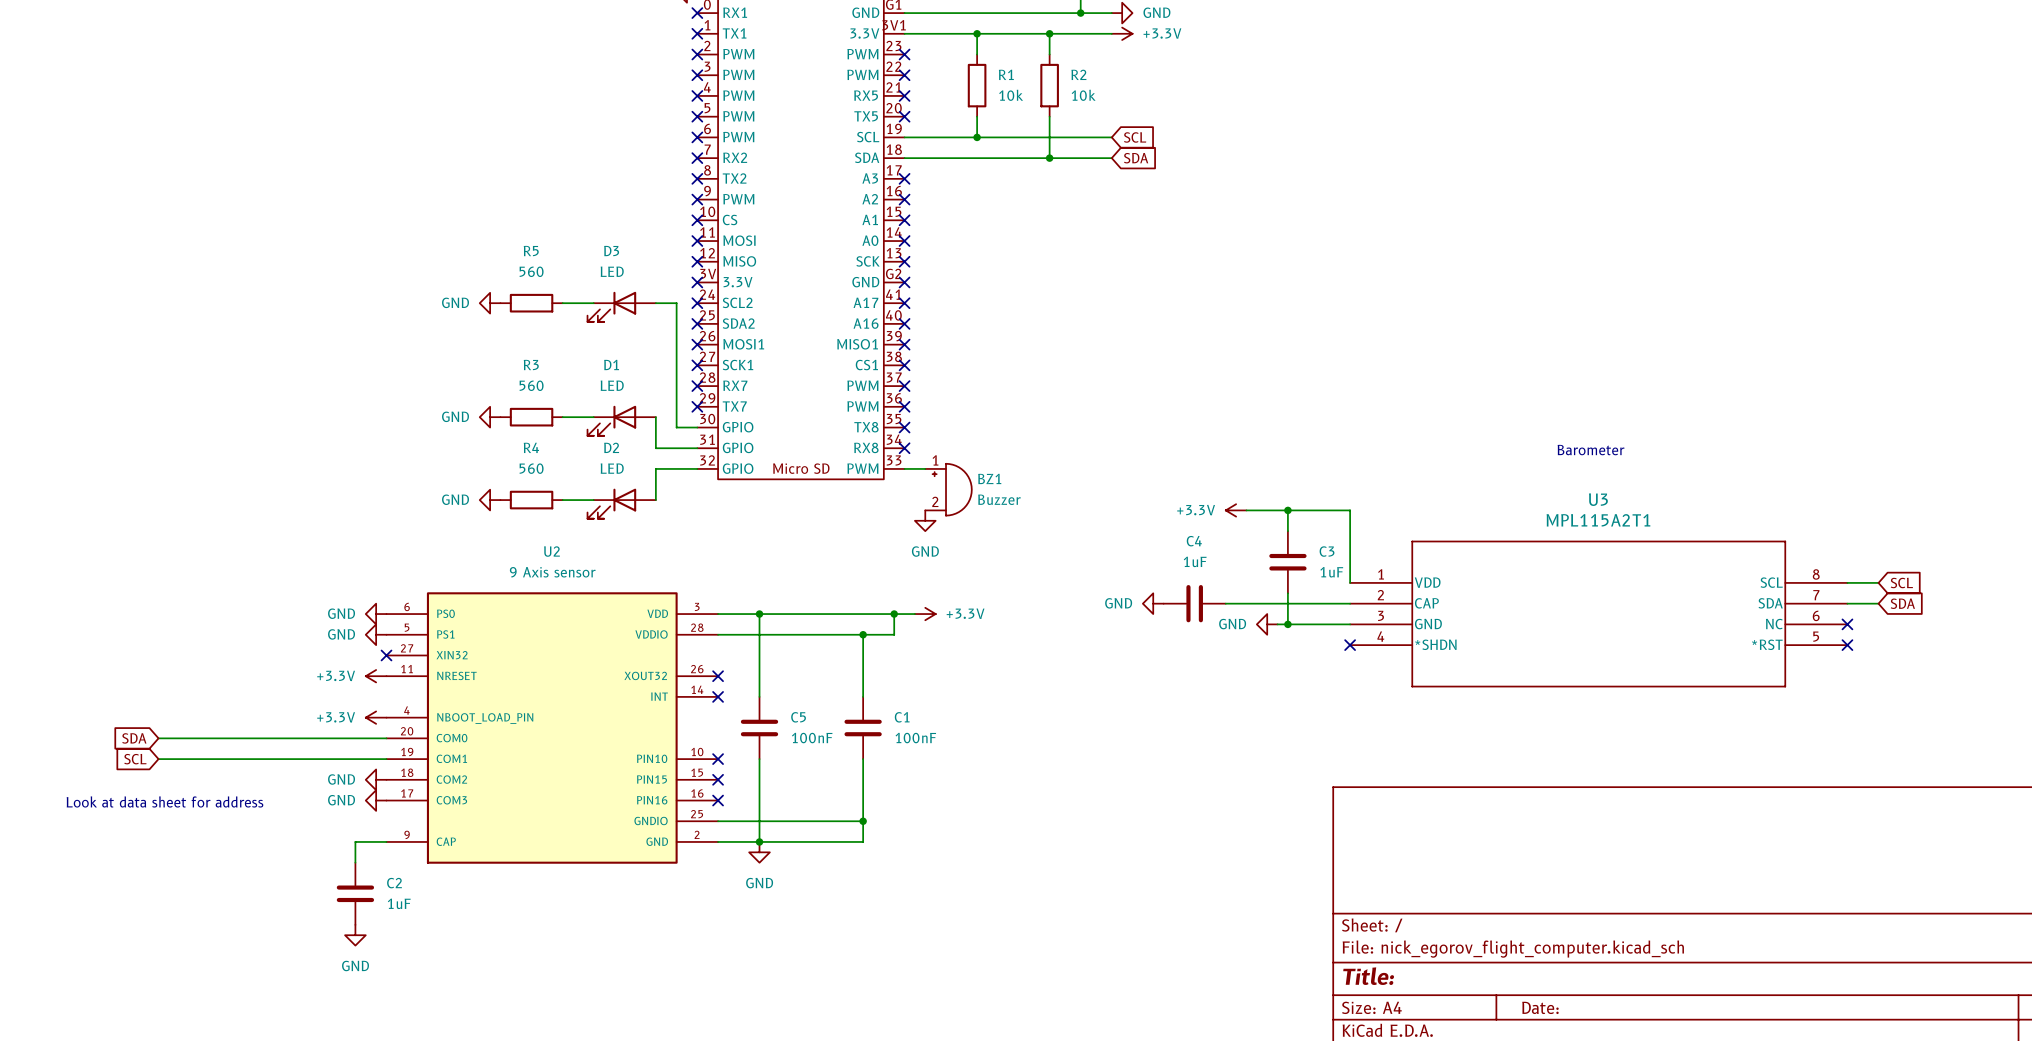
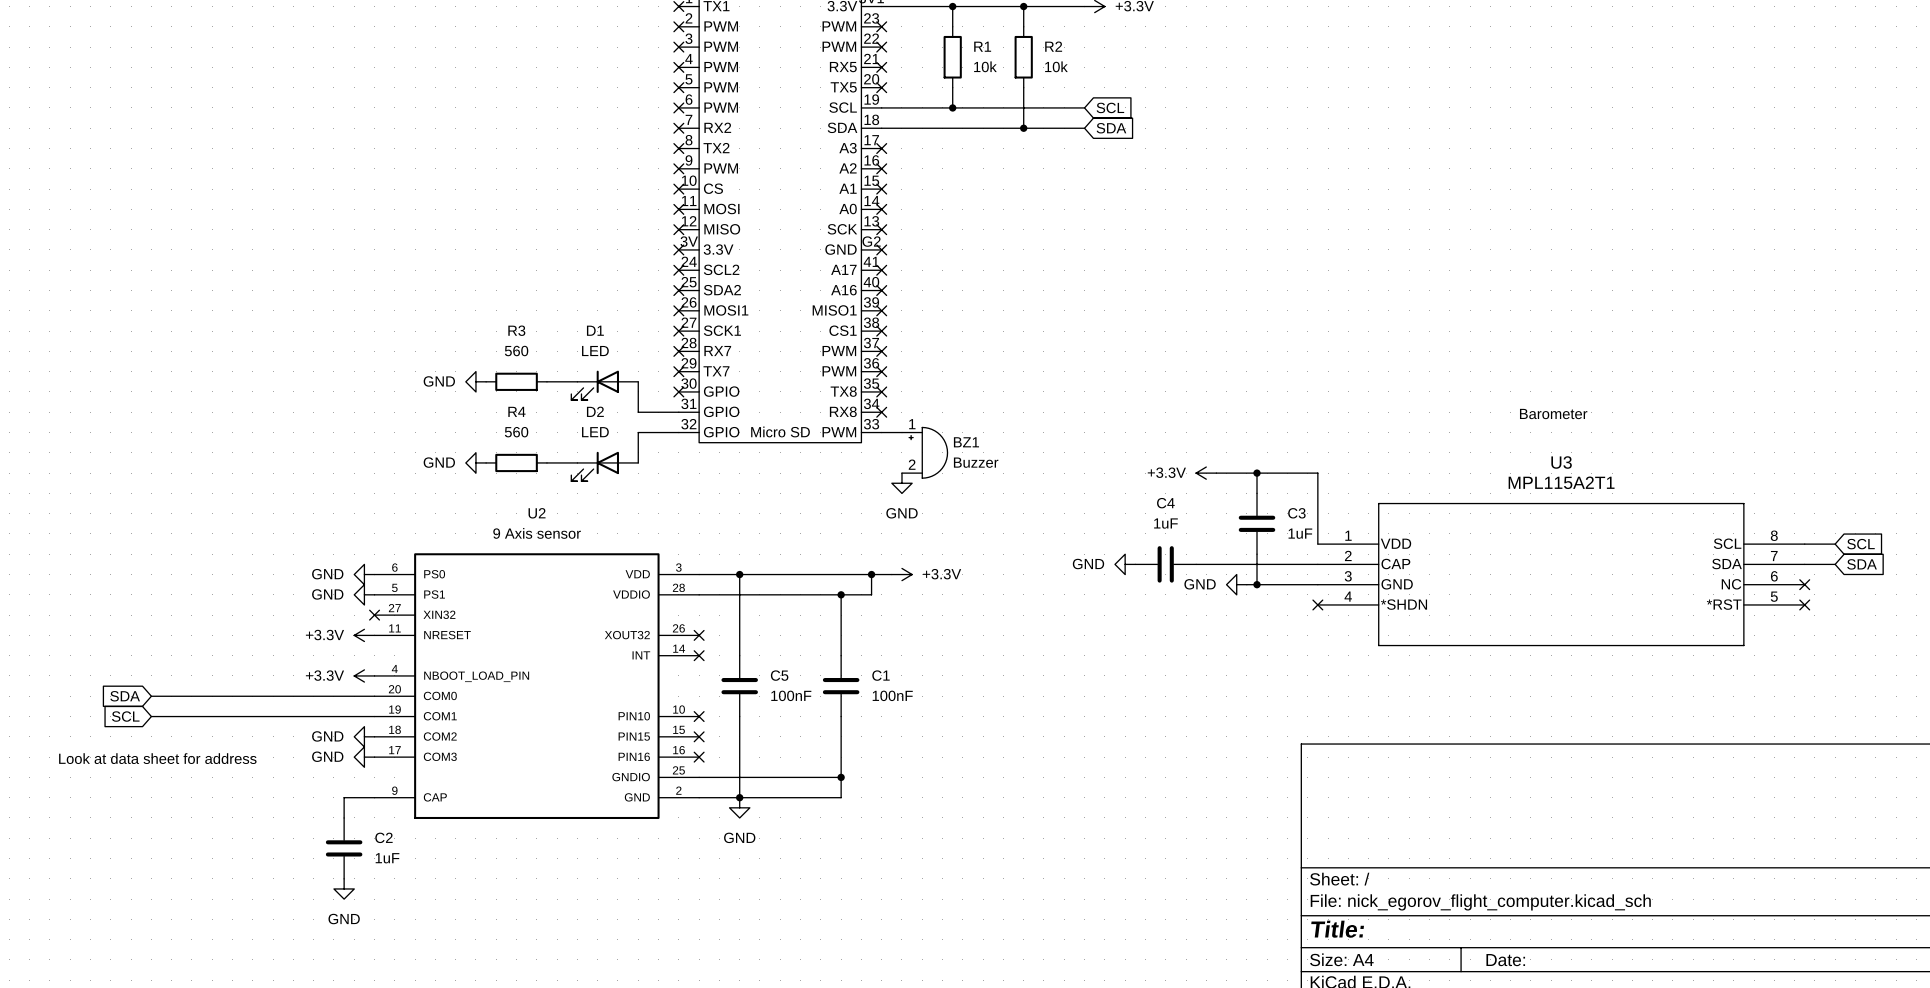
power symbol: GND (490, 303) -> none
R5: 560 (531, 303) -> none
wire: (562, 303) (593, 303) -> none
wire: (655, 303) (676, 303) (676, 427) (697, 427) -> none
D3: LED (621, 306) -> none
no-connect mark: none -> (678, 391)

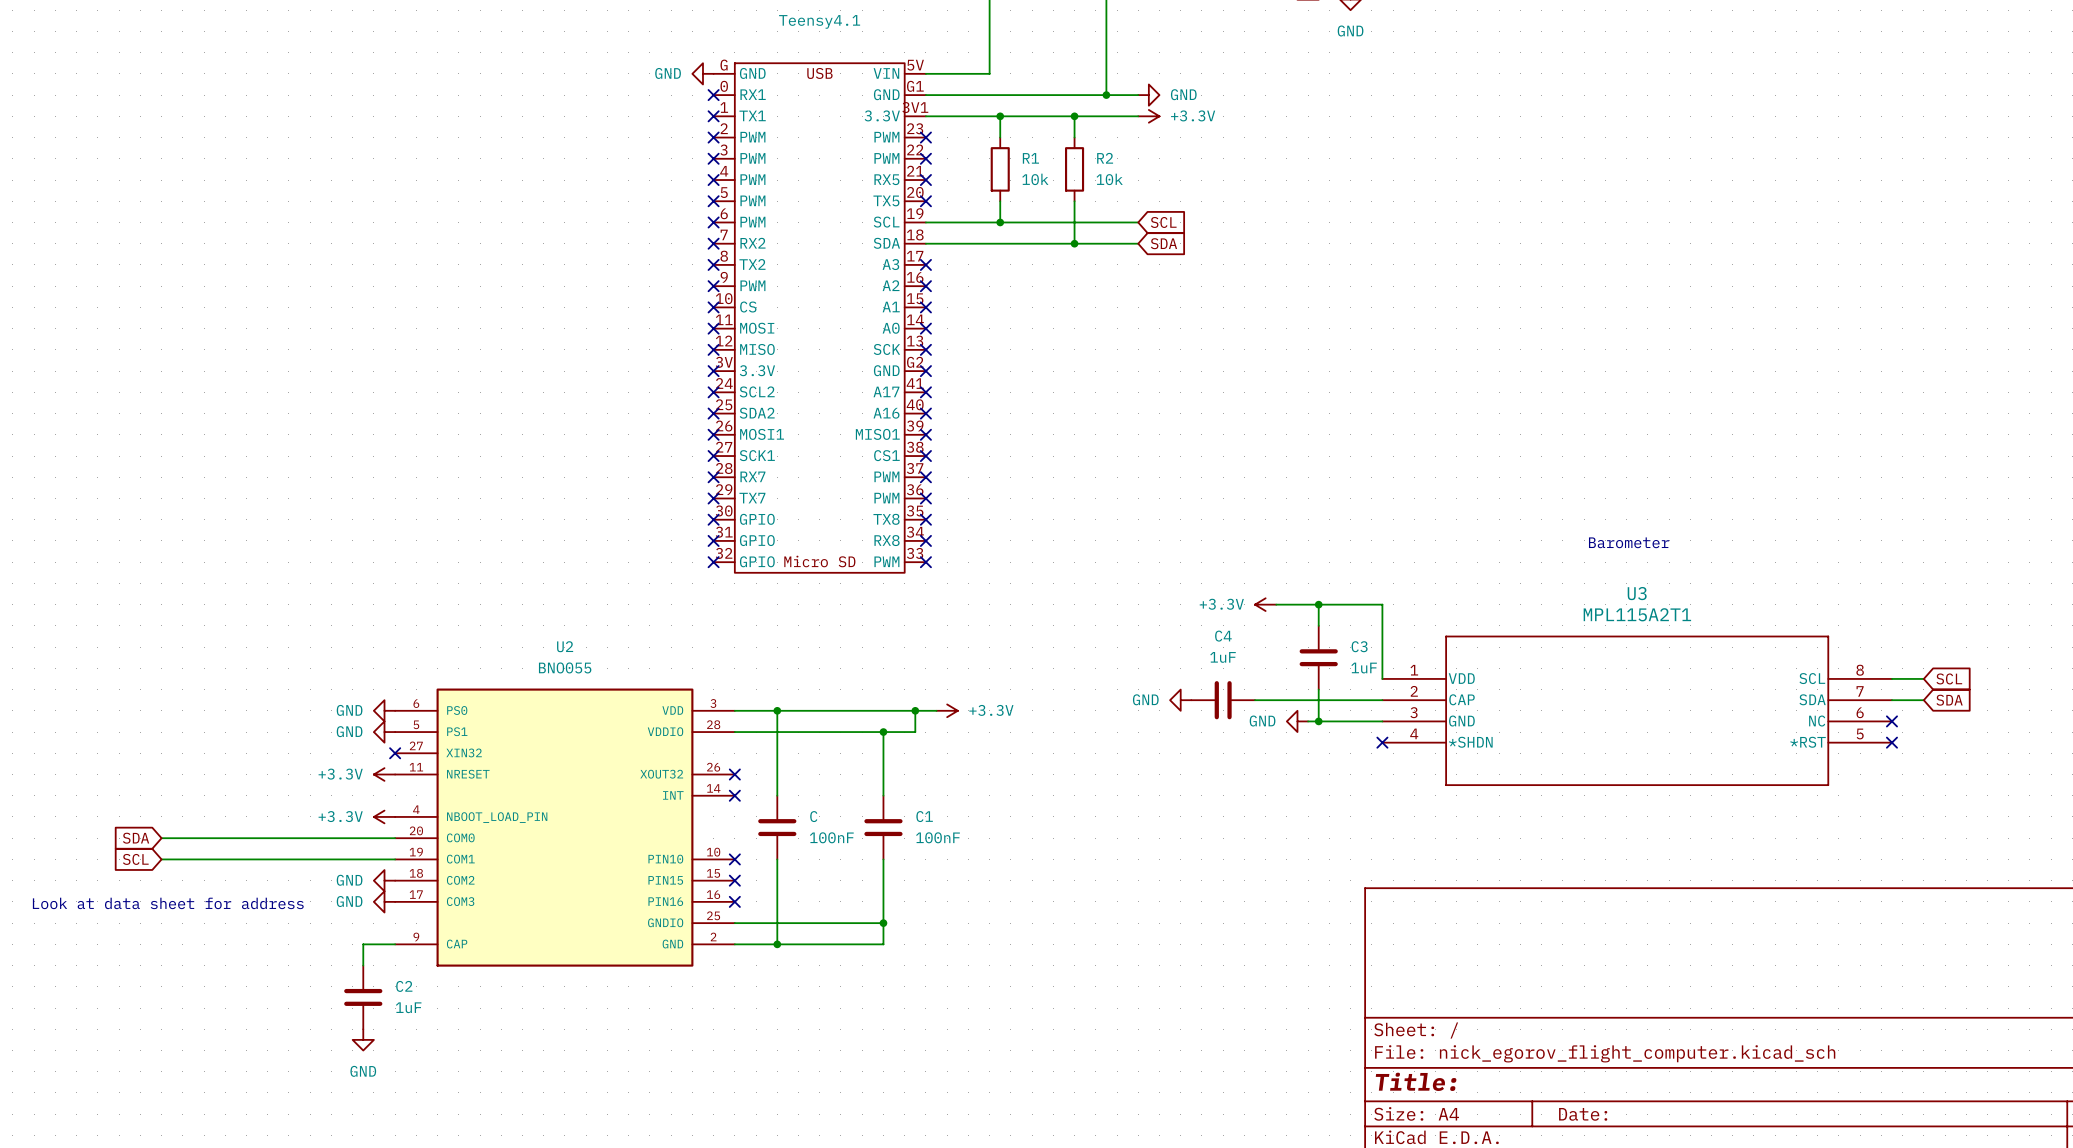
power symbol: GND (475, 381) -> none
R3: 560 (516, 381) -> none
wire: (546, 381) (577, 381) -> none
wire: (638, 381) (638, 412) (678, 412) -> none
D1: LED (604, 385) -> none
no-connect mark: none -> (713, 540)
wire: (678, 432) (638, 432) (638, 462) -> none
no-connect mark: none -> (713, 562)
wire: (881, 432) (901, 432) -> none
no-connect mark: none -> (925, 562)
BZ1: Buzzer (924, 452) -> none
power symbol: GND (475, 462) -> none
R4: 560 (516, 462) -> none
wire: (546, 462) (577, 462) -> none
D2: LED (604, 466) -> none
power symbol: GND (901, 483) -> none
U2 value: 9 Axis sensor (537, 533) -> BNO055 (565, 667)
C5 name: C5 (779, 675) -> C (813, 816)
power symbol: GND (739, 807) -> none

